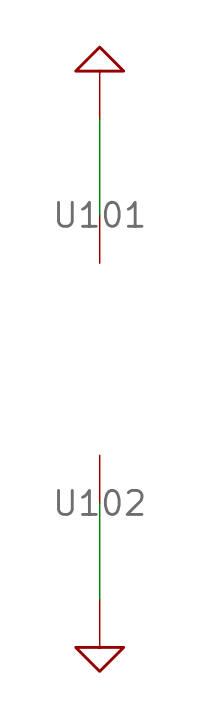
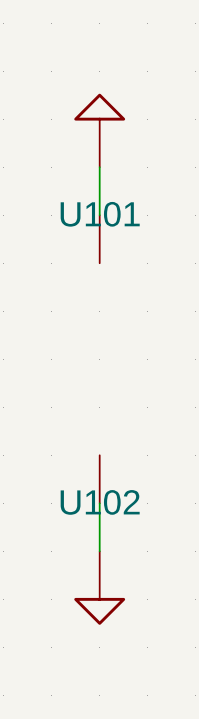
power symbol position: (99, 82) -> (99, 130)
power symbol position: (99, 636) -> (99, 588)

